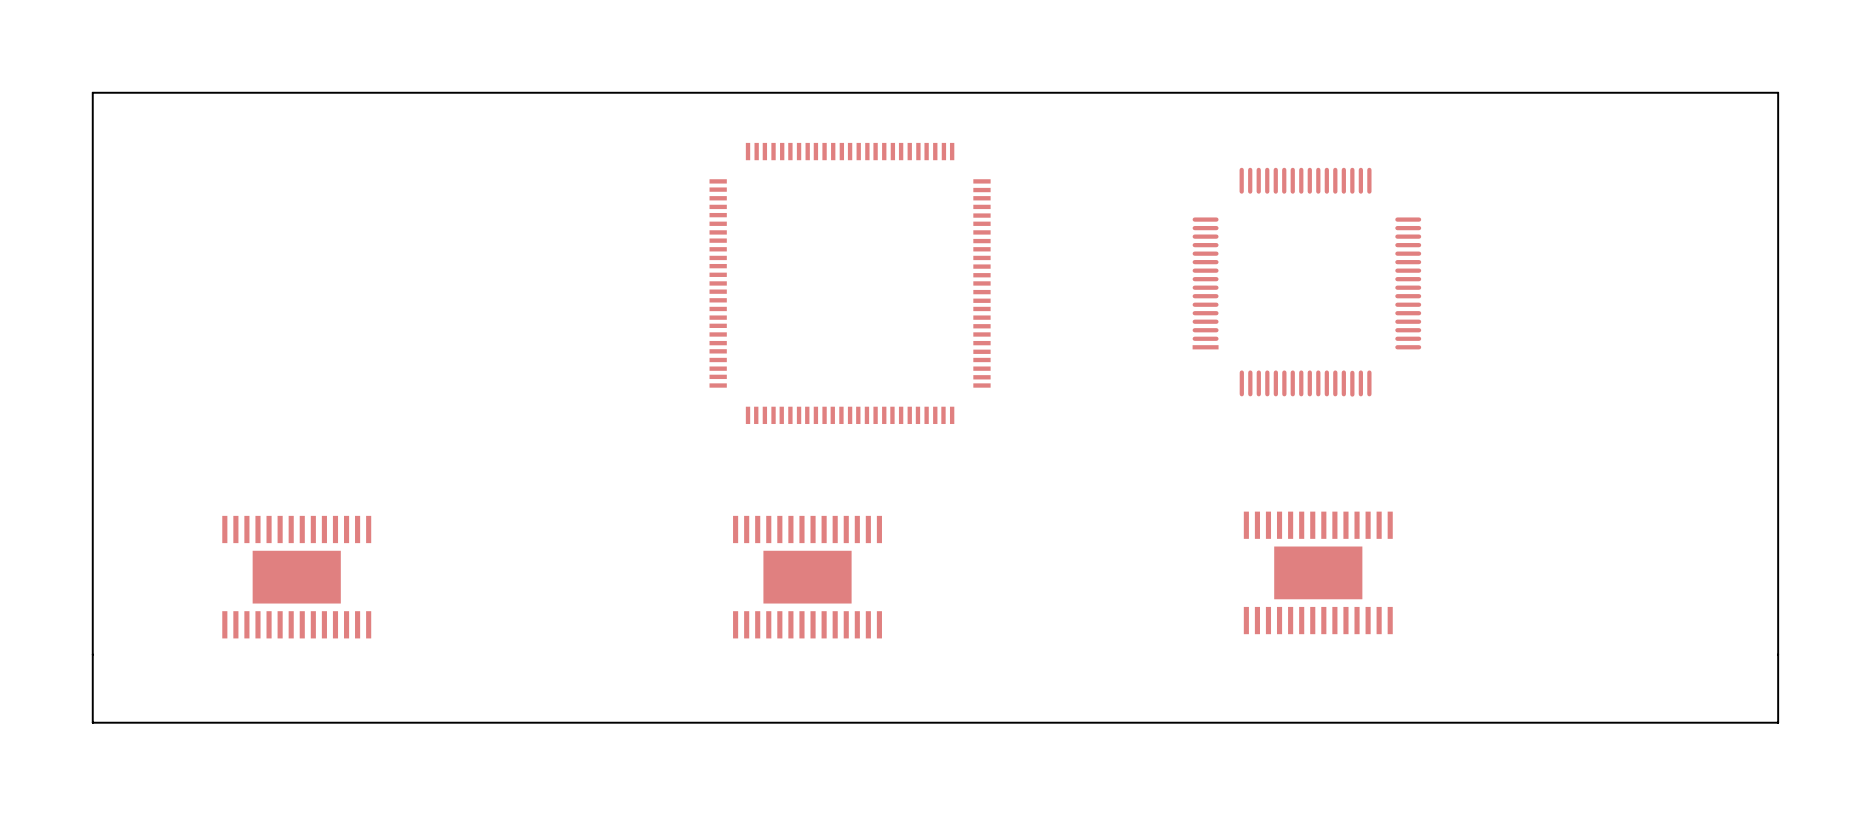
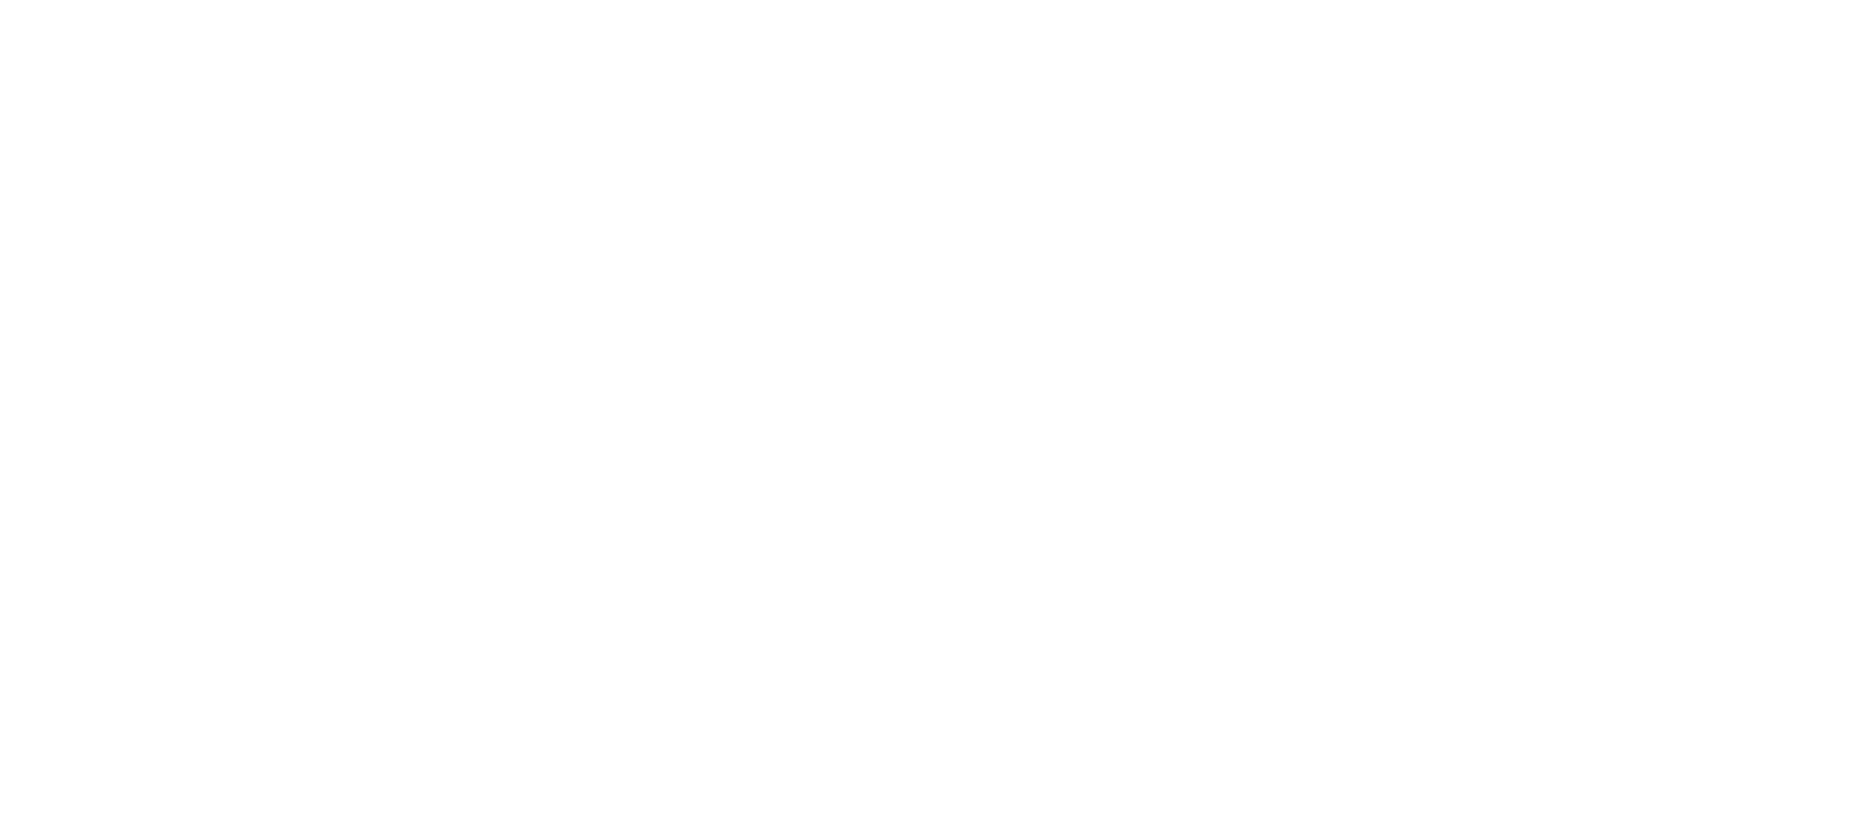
board edge: (1778, 92) (1778, 722) (92, 722) (92, 92) (1778, 92) -> none
part: (1306, 282) -> none
part: (850, 283) -> none
part: (1318, 572) -> none
part: (296, 577) -> none
part: (807, 577) -> none

